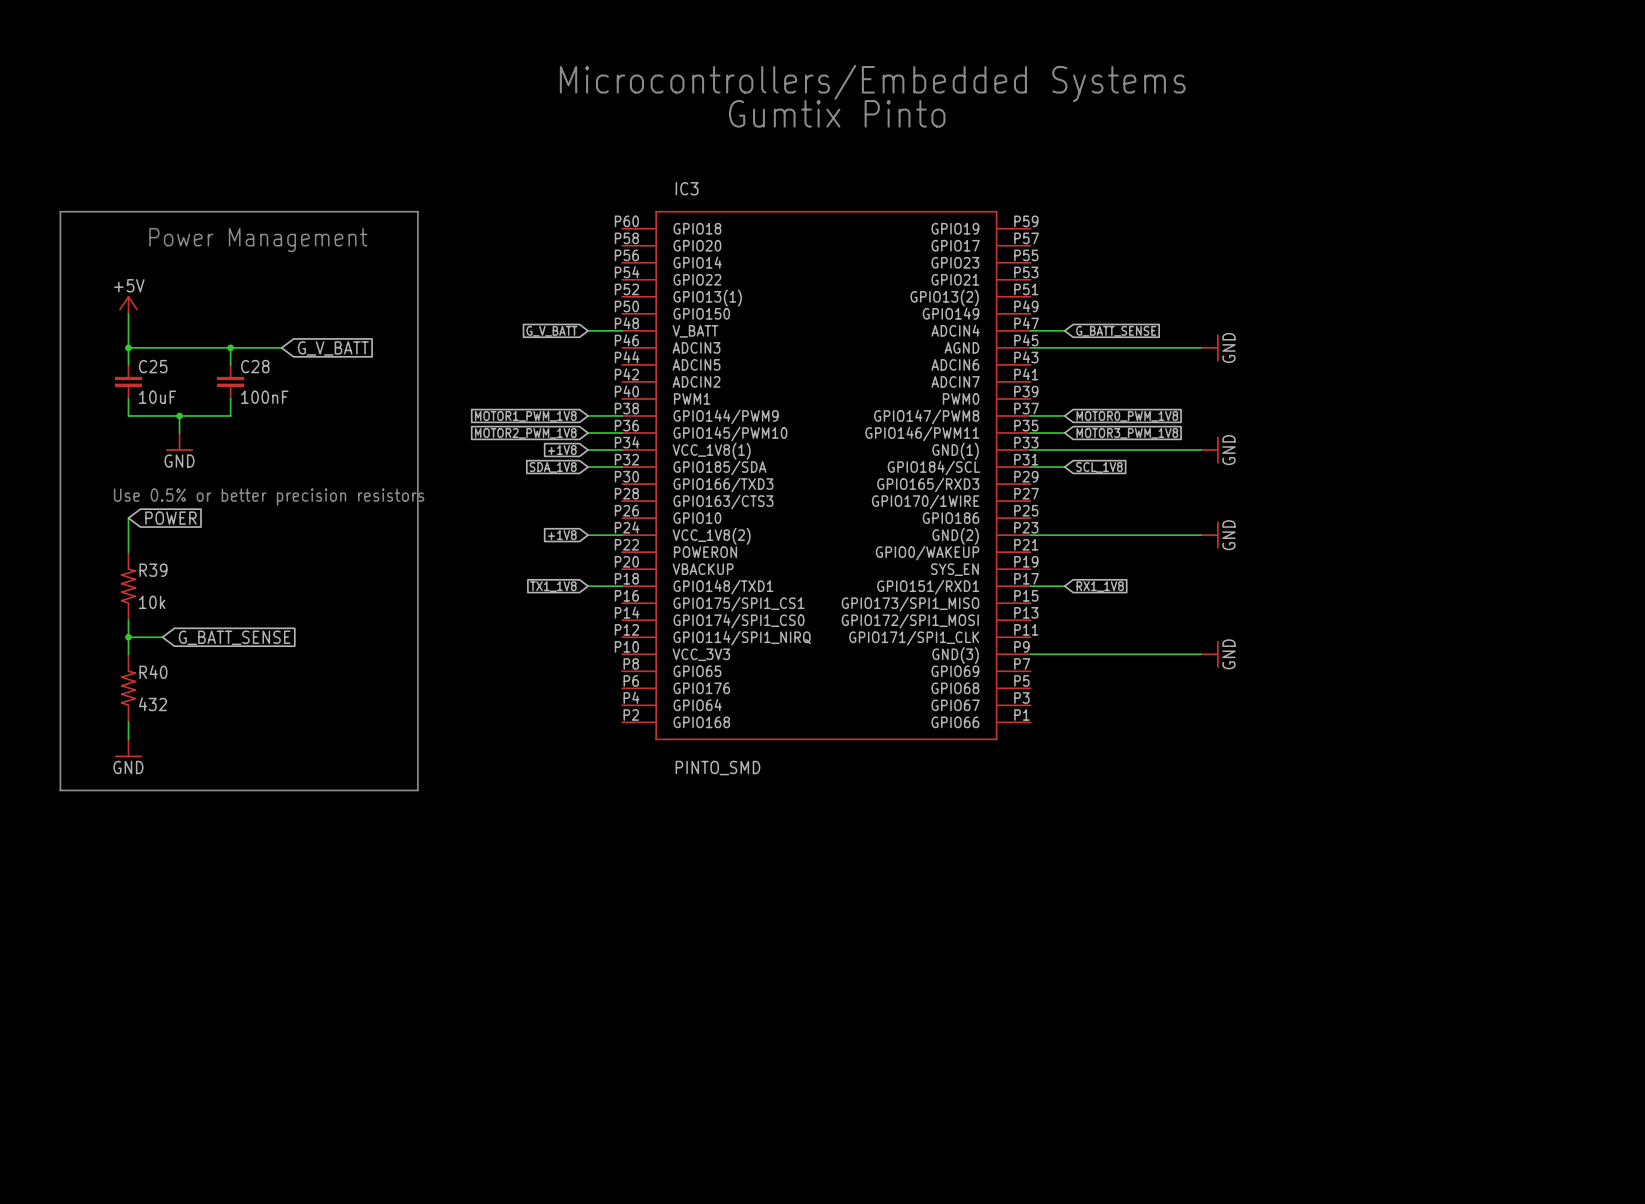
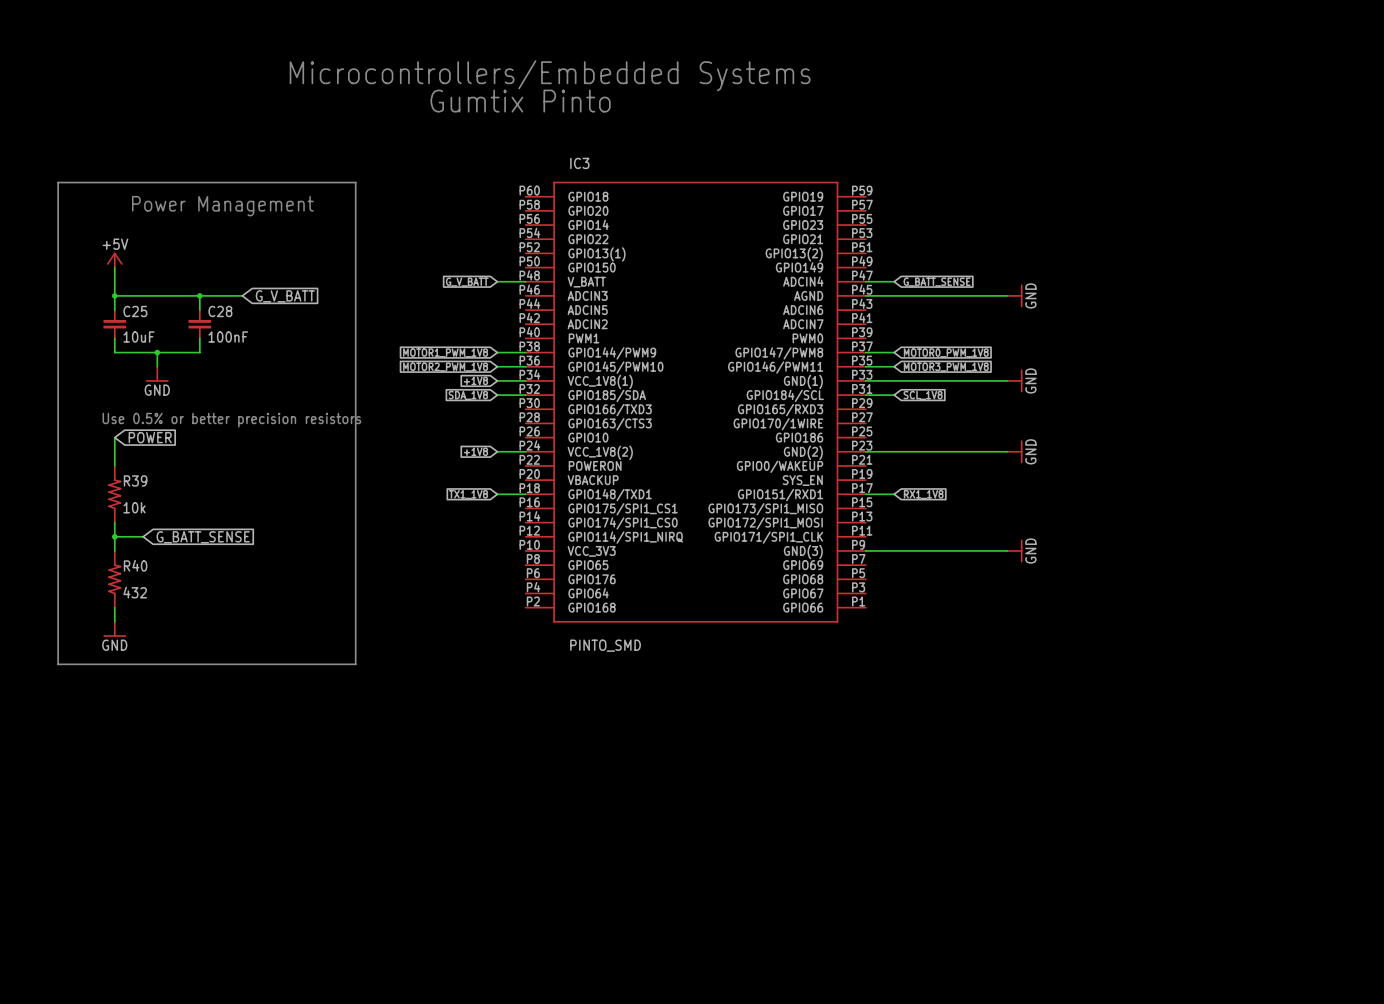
text: none -> Microcontrollers/Embedded Systems (550, 75)
text: Microcontrollers/Embedded Systems (872, 83) -> none
text: none -> Gumtix Pinto (520, 101)
text: Gumtix Pinto (837, 113) -> none

